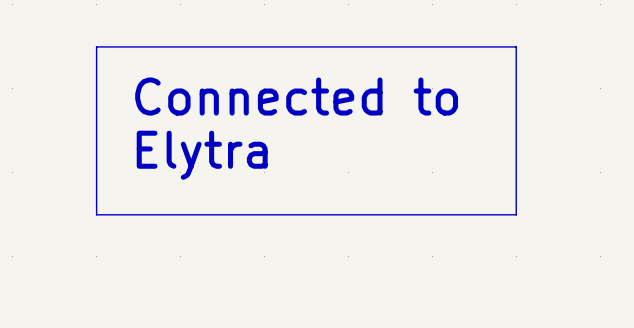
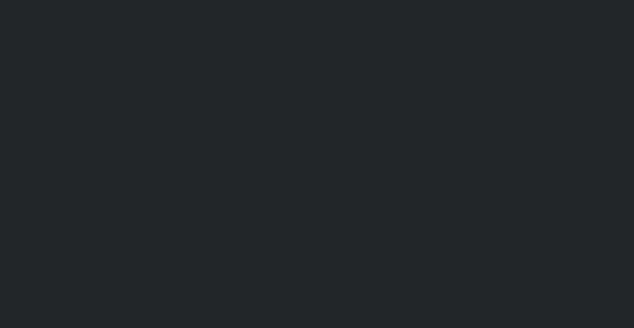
line: (96, 46) (516, 46) (516, 214) (96, 214) (96, 46) -> none
text: Connected to (296, 96) -> none
text: Elytra (202, 155) -> none

